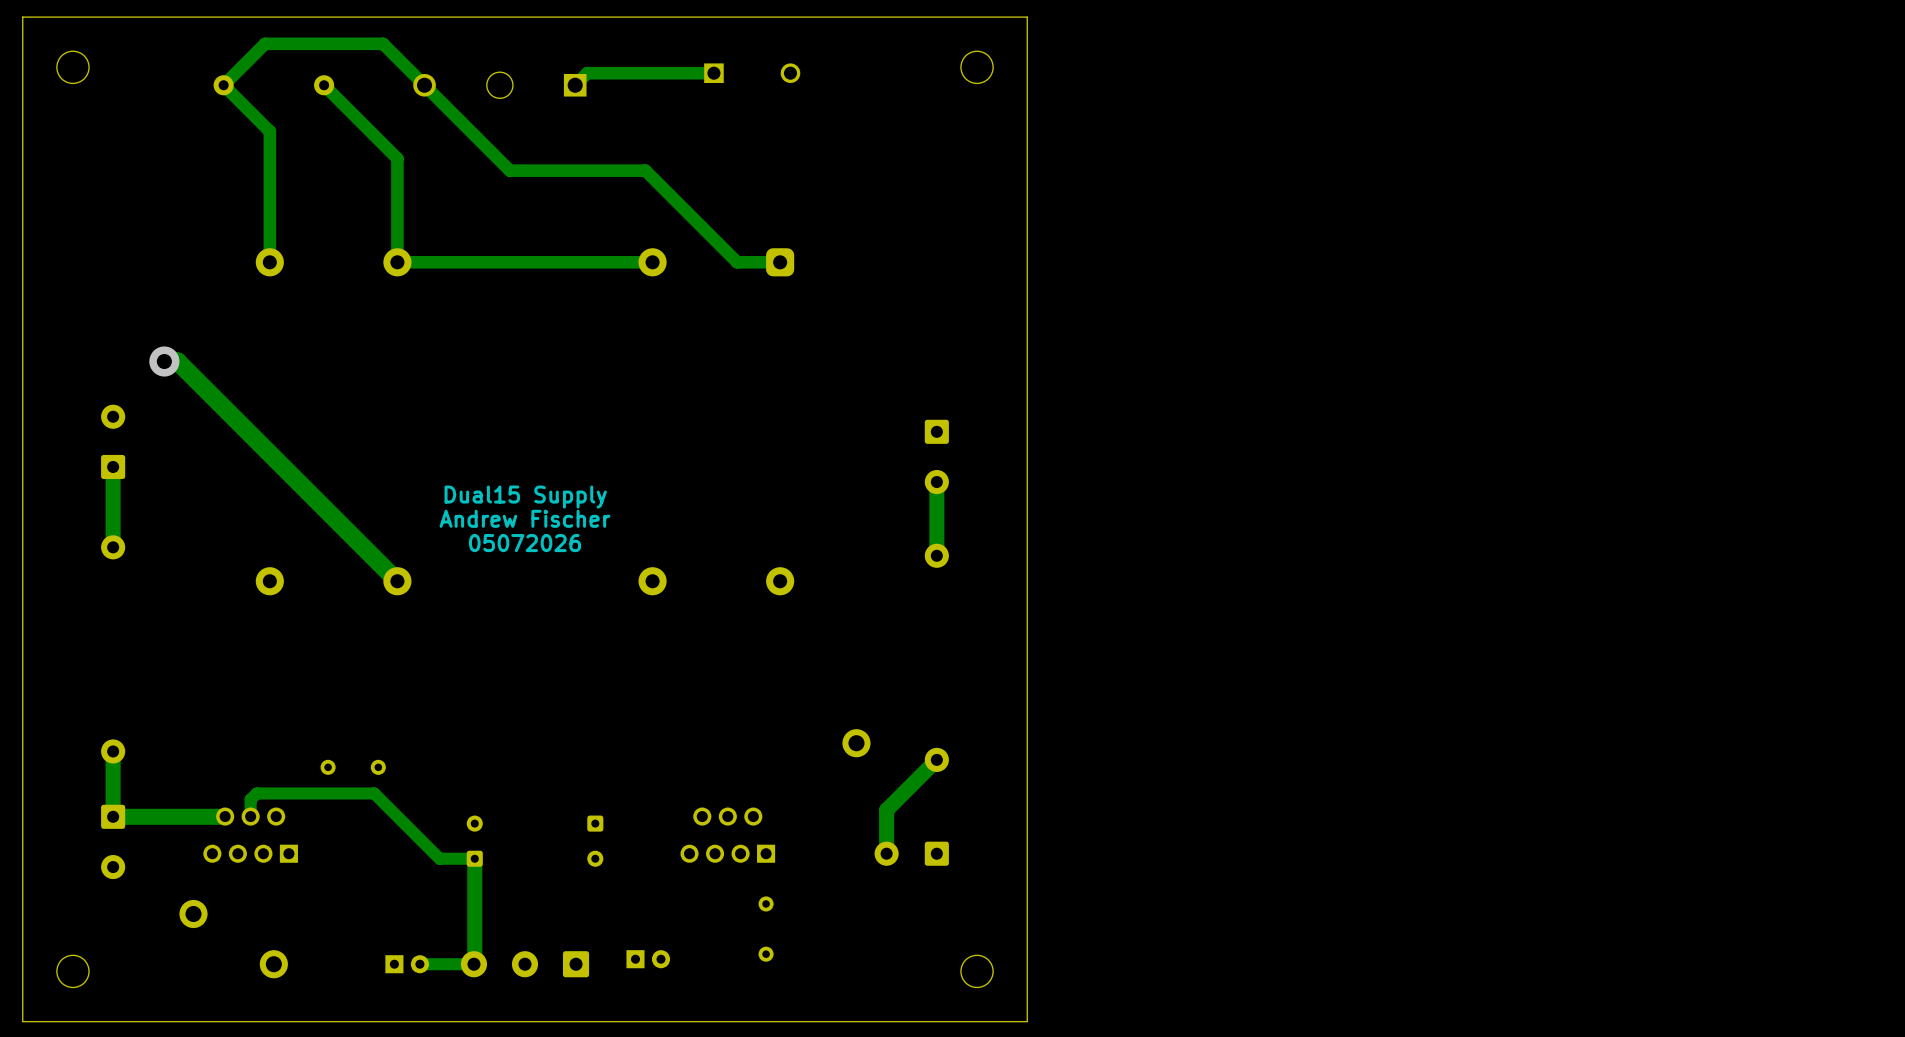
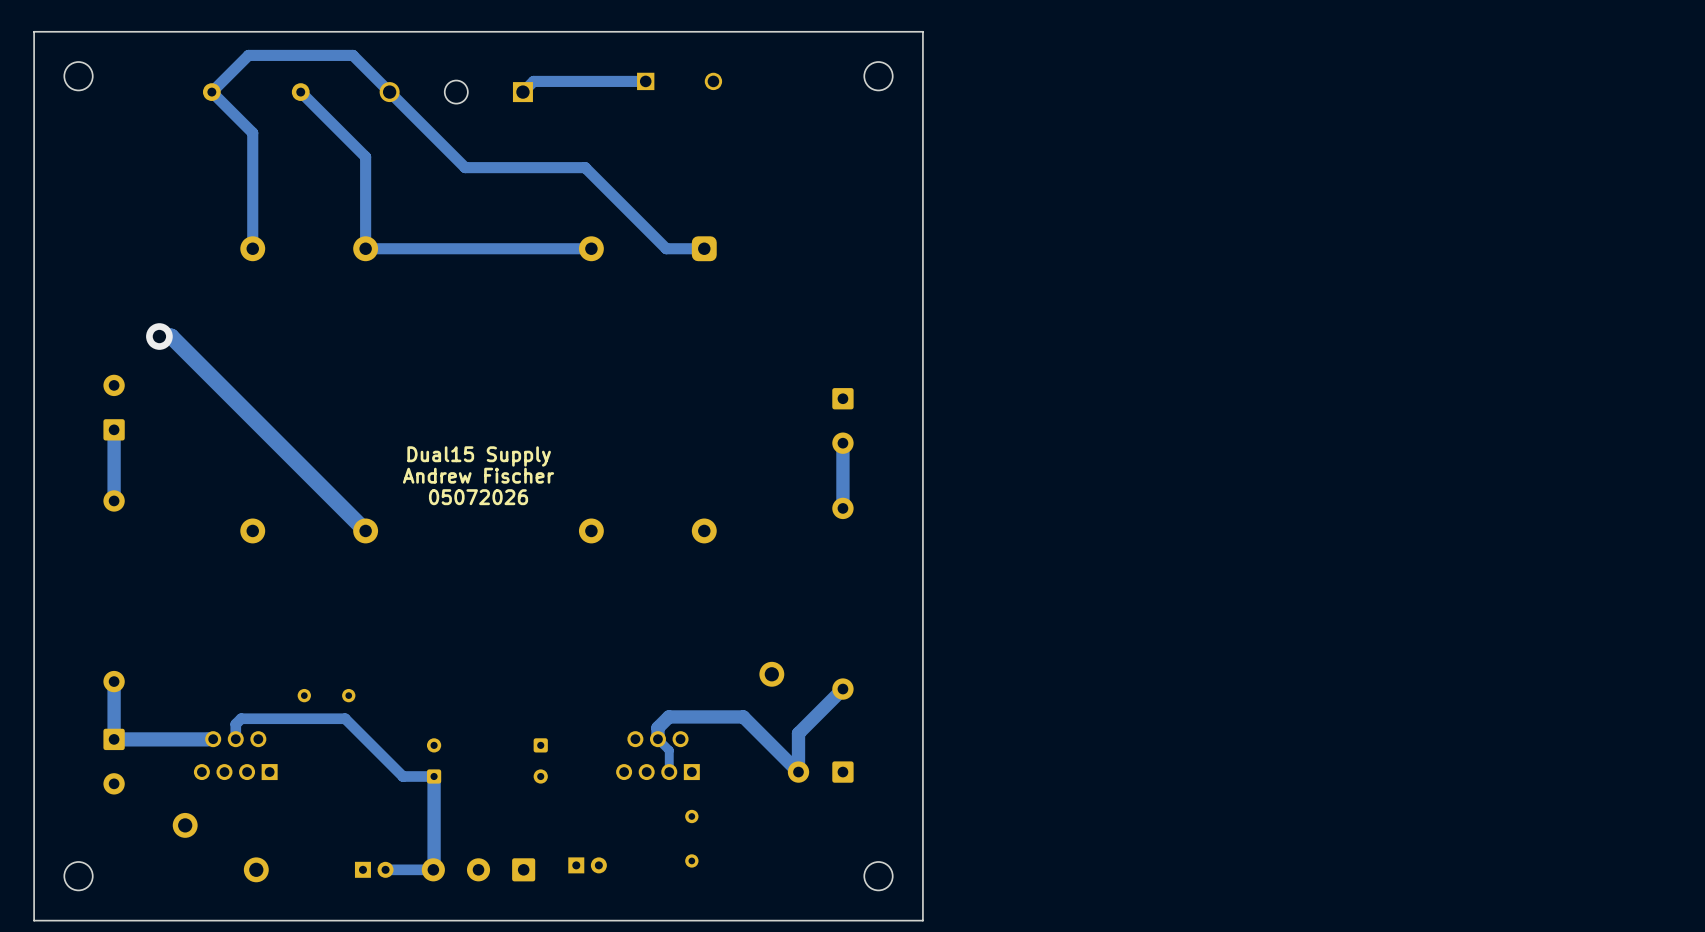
track: none -> (798, 772) (743, 716) (668, 716) (657, 727) (657, 739) (669, 750) (669, 772)

